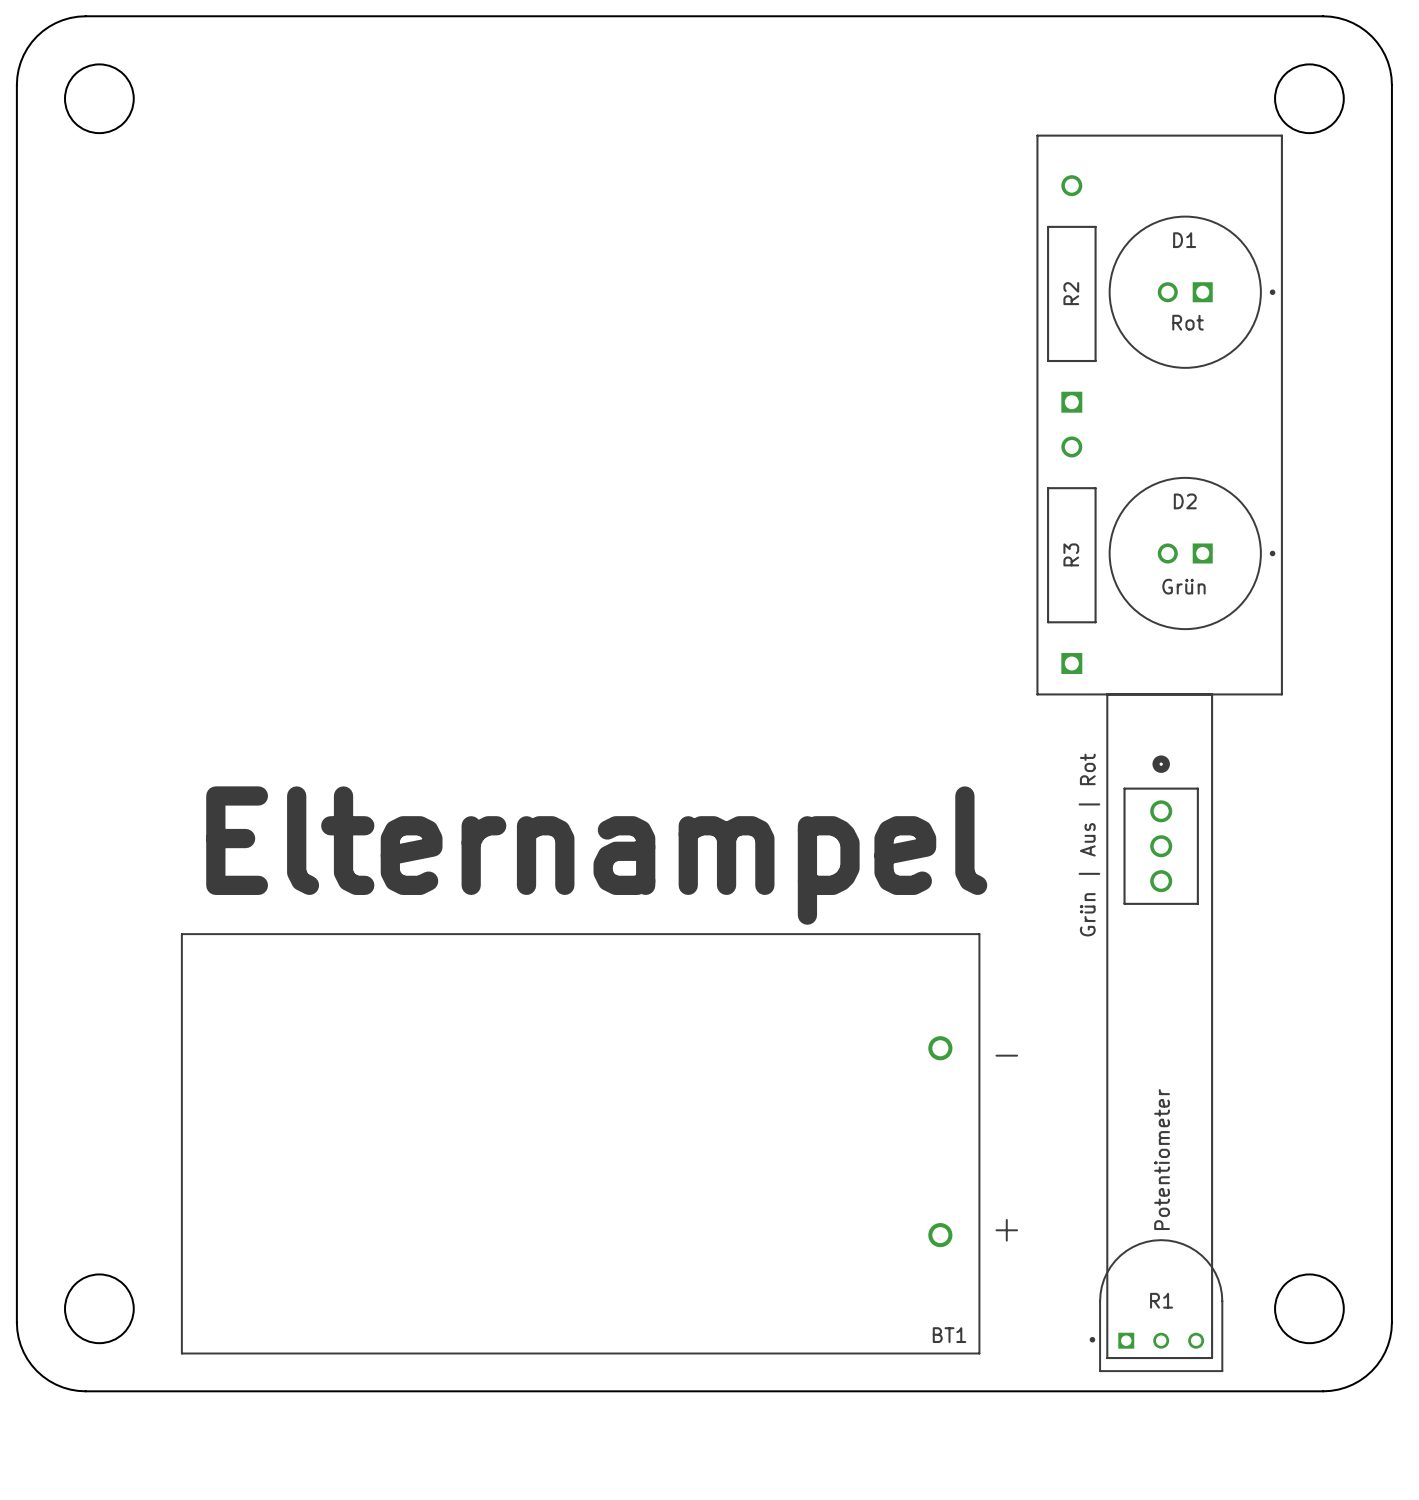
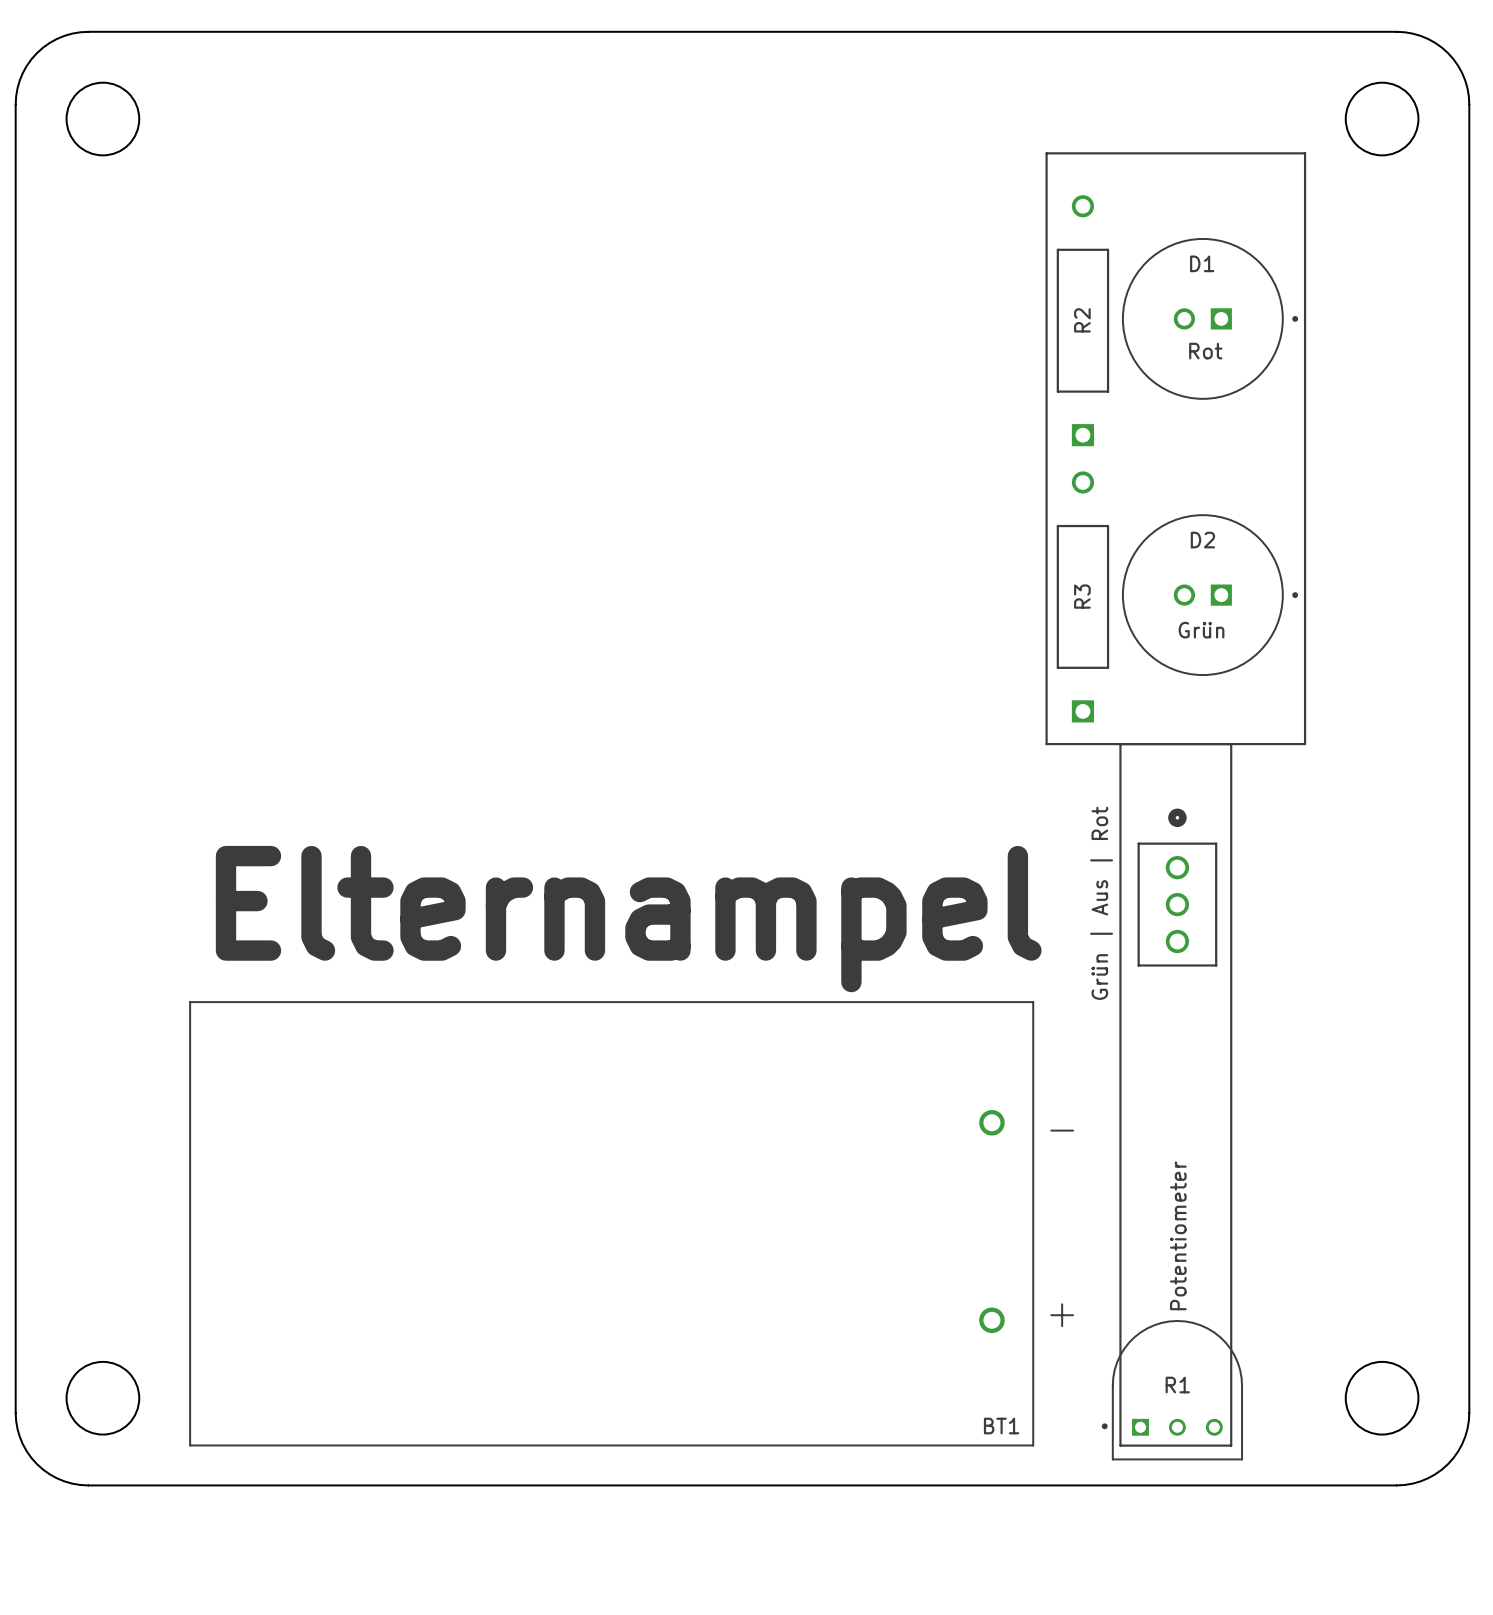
line: (1037, 135) (1281, 135) (1281, 694) (1037, 694) (1037, 135) -> (1046, 153) (1046, 744) (1305, 744) (1305, 153) (1046, 153)
D1 position: (1192, 292) -> (1210, 318)
R2 position: (1071, 293) -> (1082, 320)
text position: Rot (1188, 322) -> Rot (1205, 351)
D2 position: (1192, 553) -> (1210, 595)
R3 position: (1071, 555) -> (1082, 596)
text position: Grün (1183, 586) -> Grün (1201, 630)
line: (1107, 694) (1107, 1358) (1212, 1358) (1212, 694) -> (1120, 744) (1120, 1445) (1231, 1445) (1231, 744)
part position: (1161, 830) -> (1177, 887)
text position: Grün | Aus | Rot (1089, 845) -> Grün | Aus | Rot (1101, 903)
text position: Potentiometer (1162, 1159) -> Potentiometer (1178, 1235)
R1 position: (1156, 1305) -> (1172, 1390)

